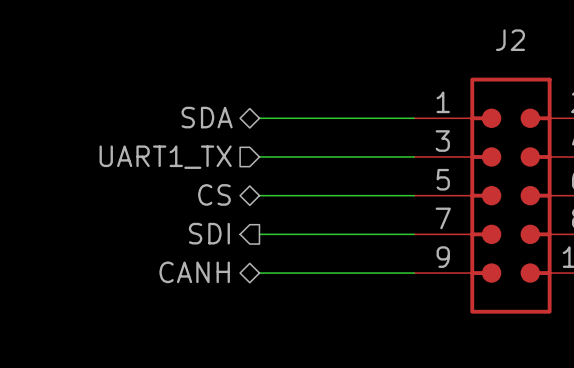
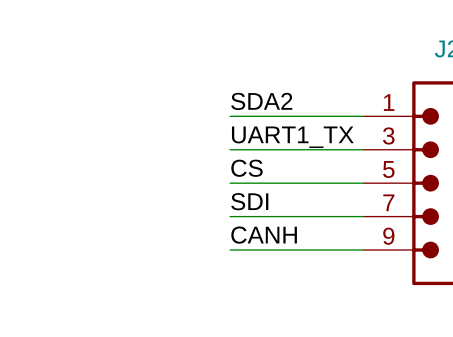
label: none -> SDA2 (261, 101)
hierarchical label: SDA (207, 117) -> none
label: none -> UART1_TX (292, 137)
hierarchical label: UART1_TX (165, 157) -> none
label: none -> CS (247, 168)
hierarchical label: CS (214, 194) -> none
label: none -> SDI (249, 201)
hierarchical label: SDI (209, 233) -> none
label: none -> CANH (264, 235)
hierarchical label: CANH (194, 272) -> none

